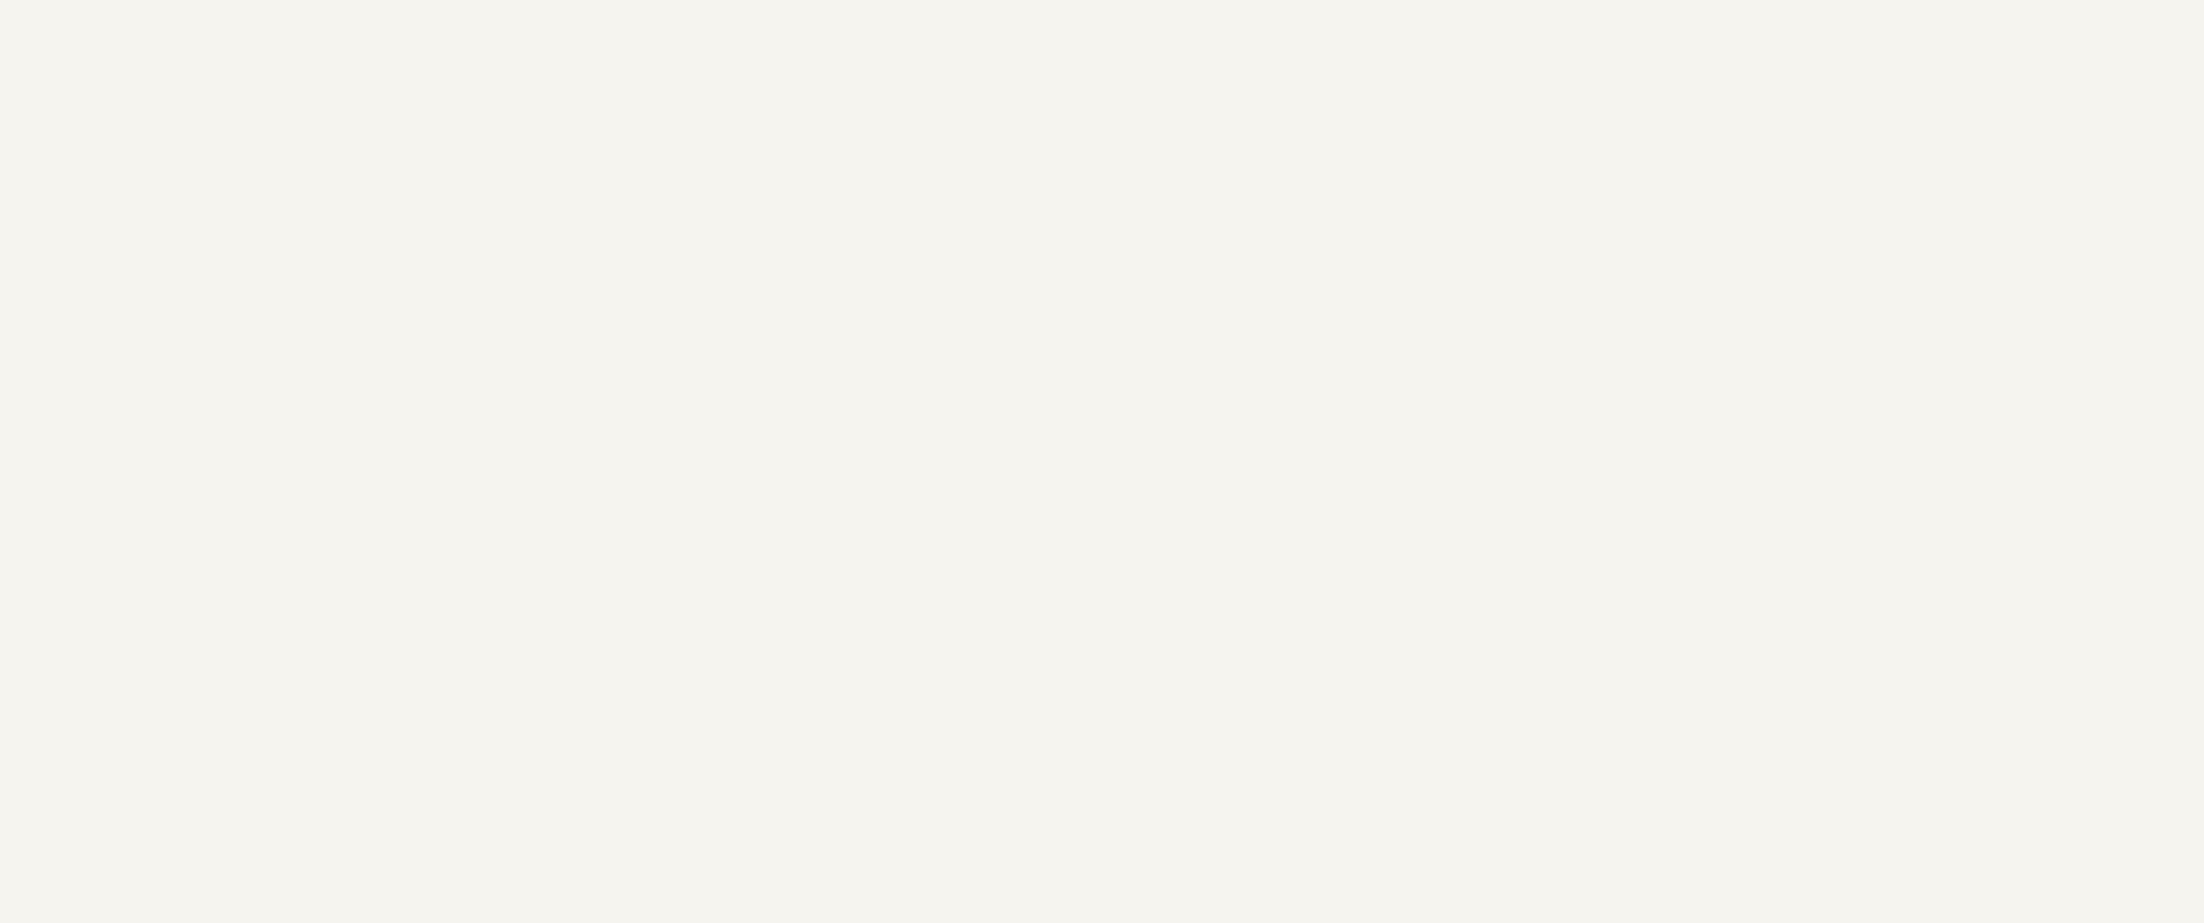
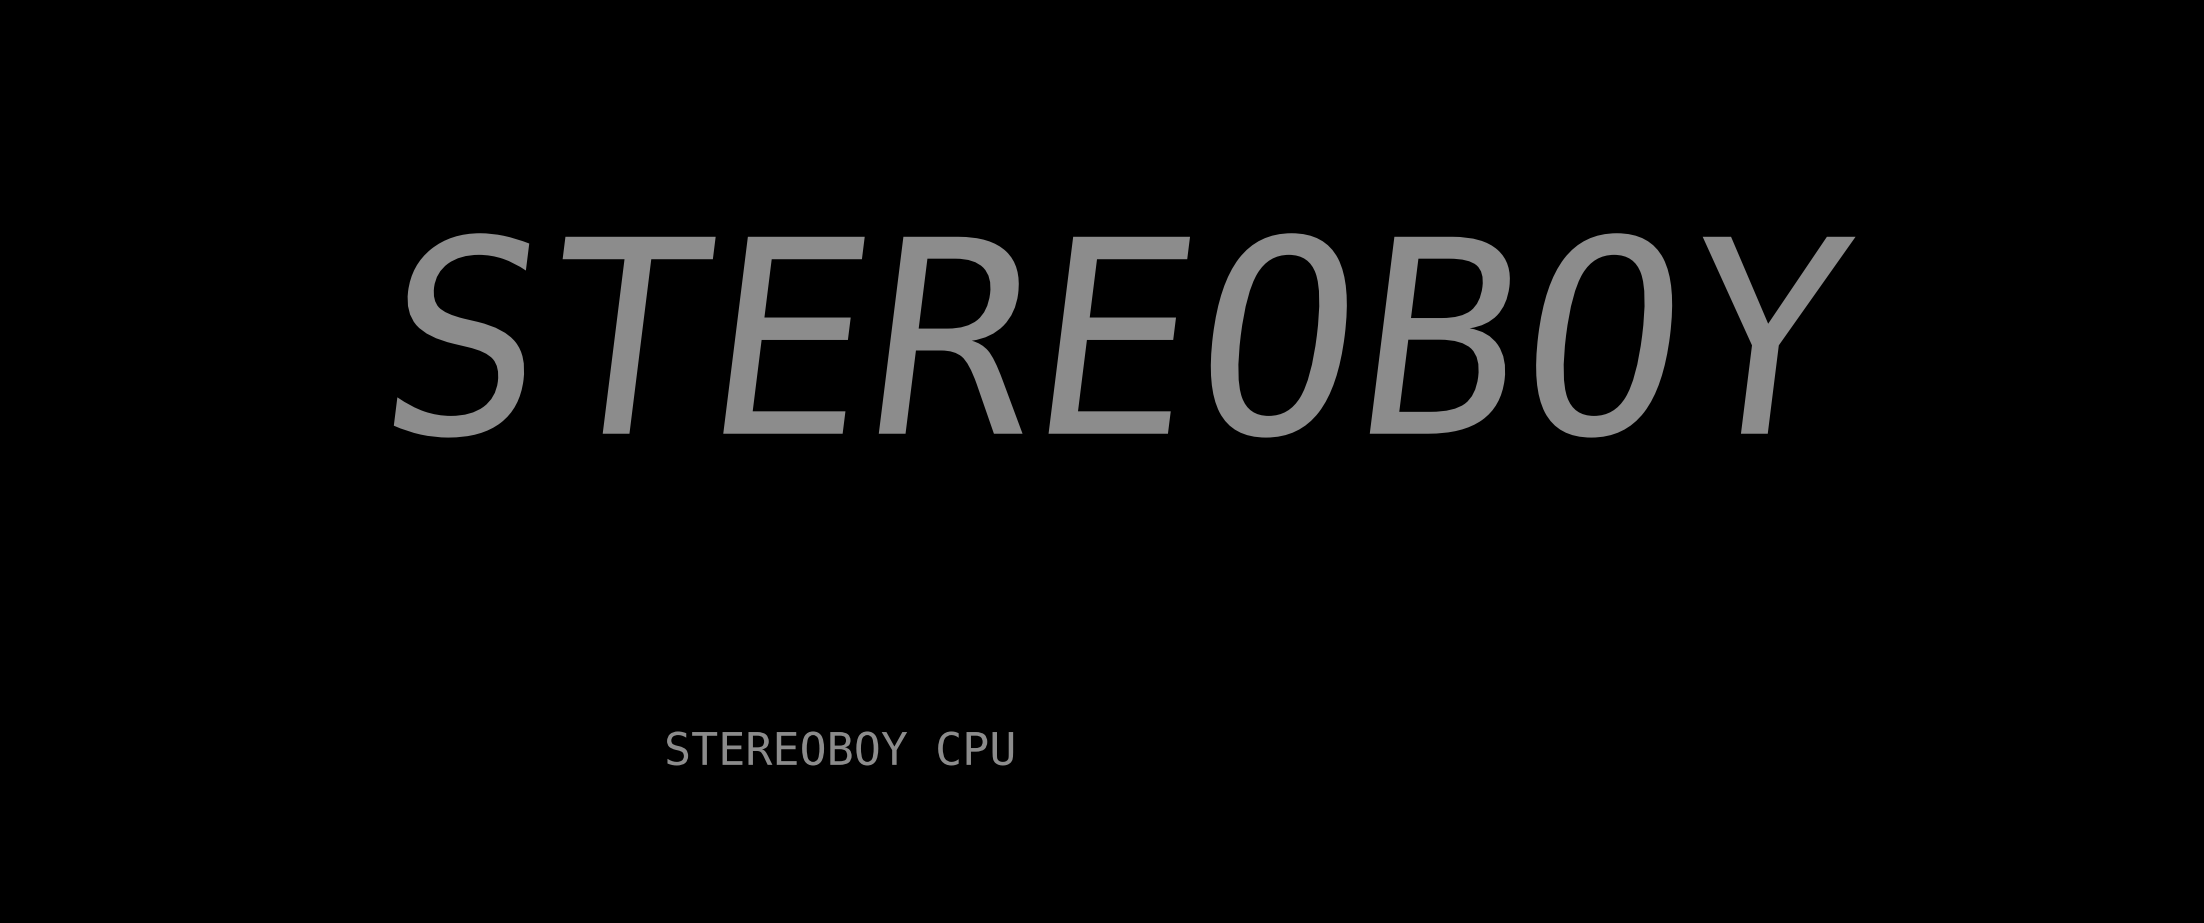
text: none -> STEREOBOY (1124, 335)
text: none -> STEREOBOY CPU (840, 748)

